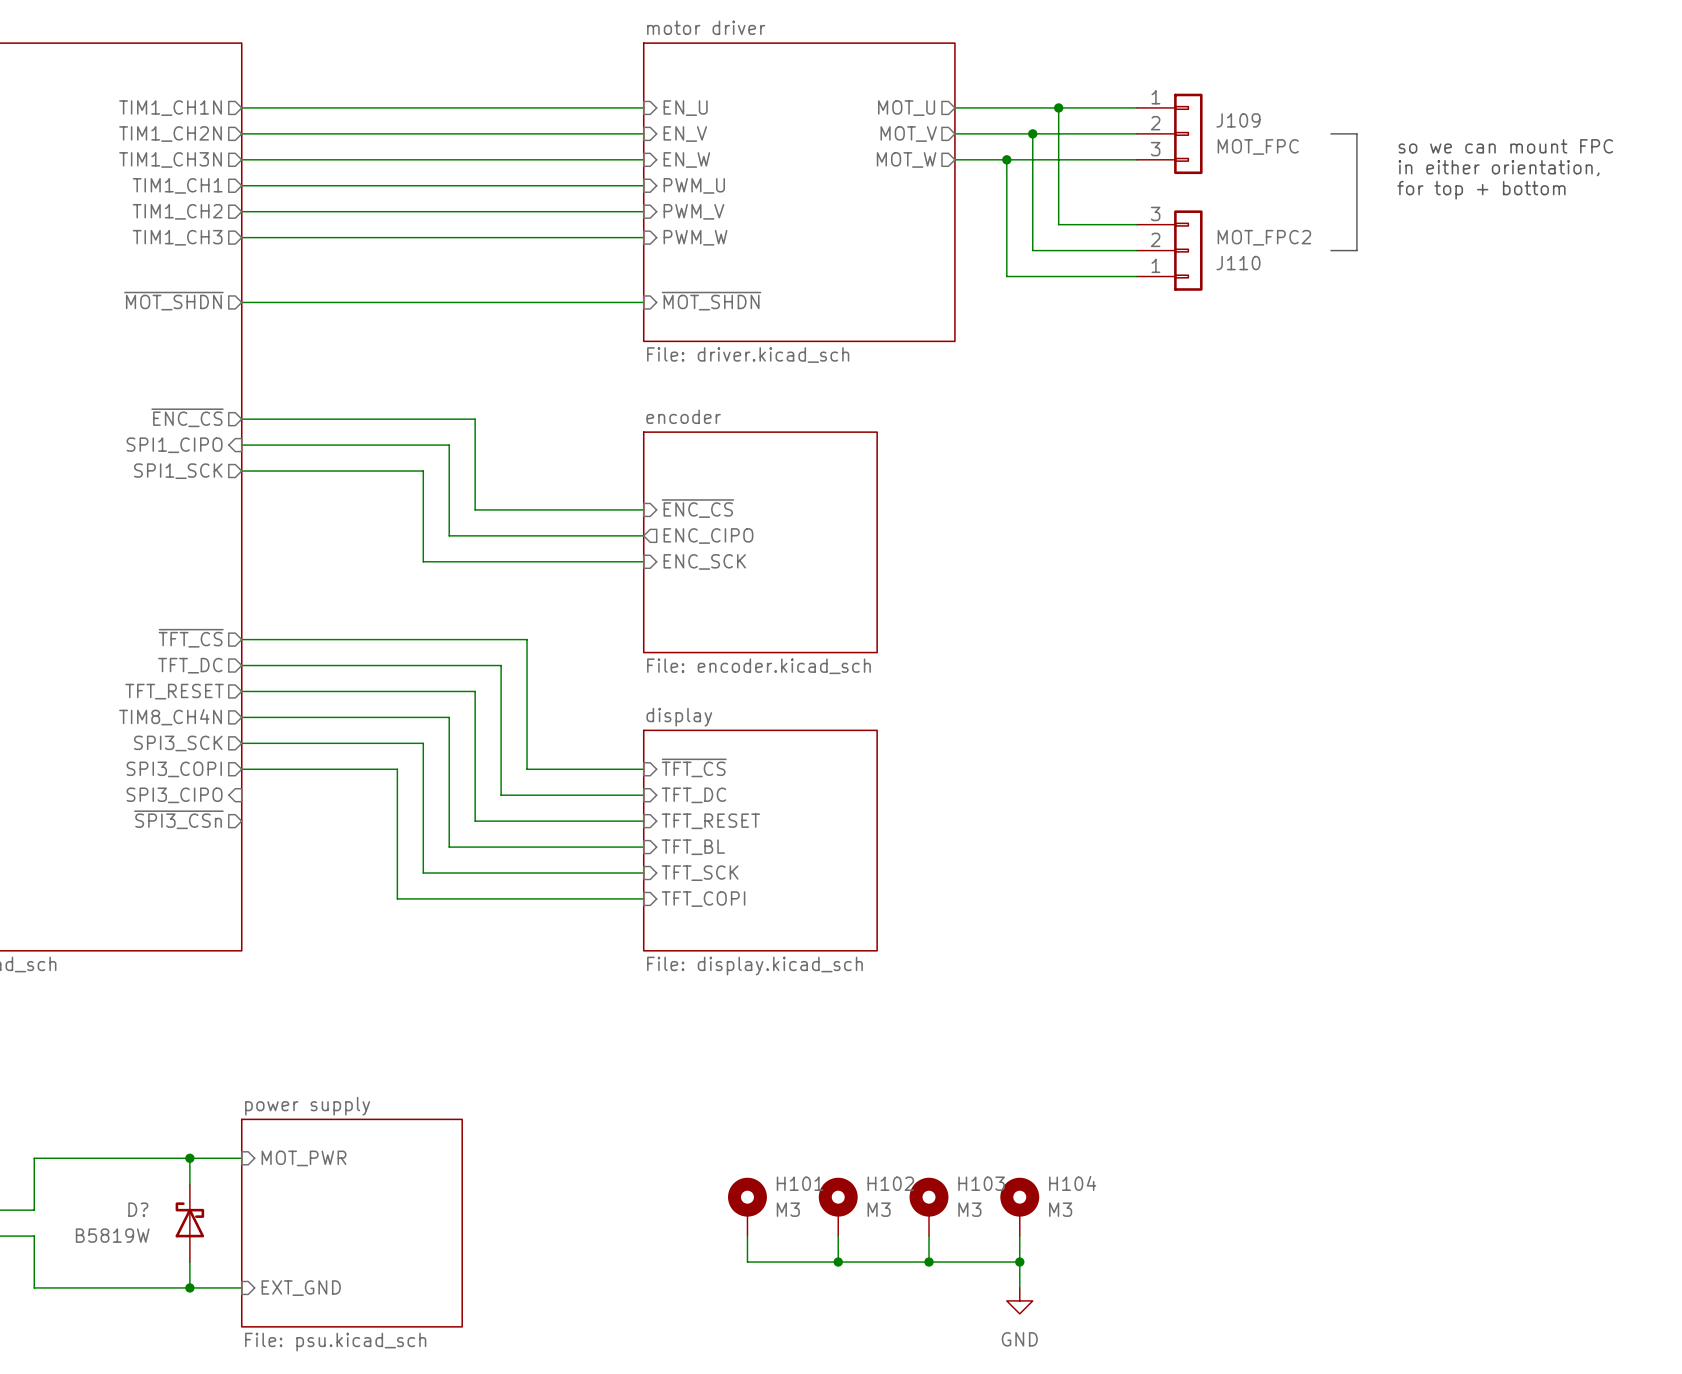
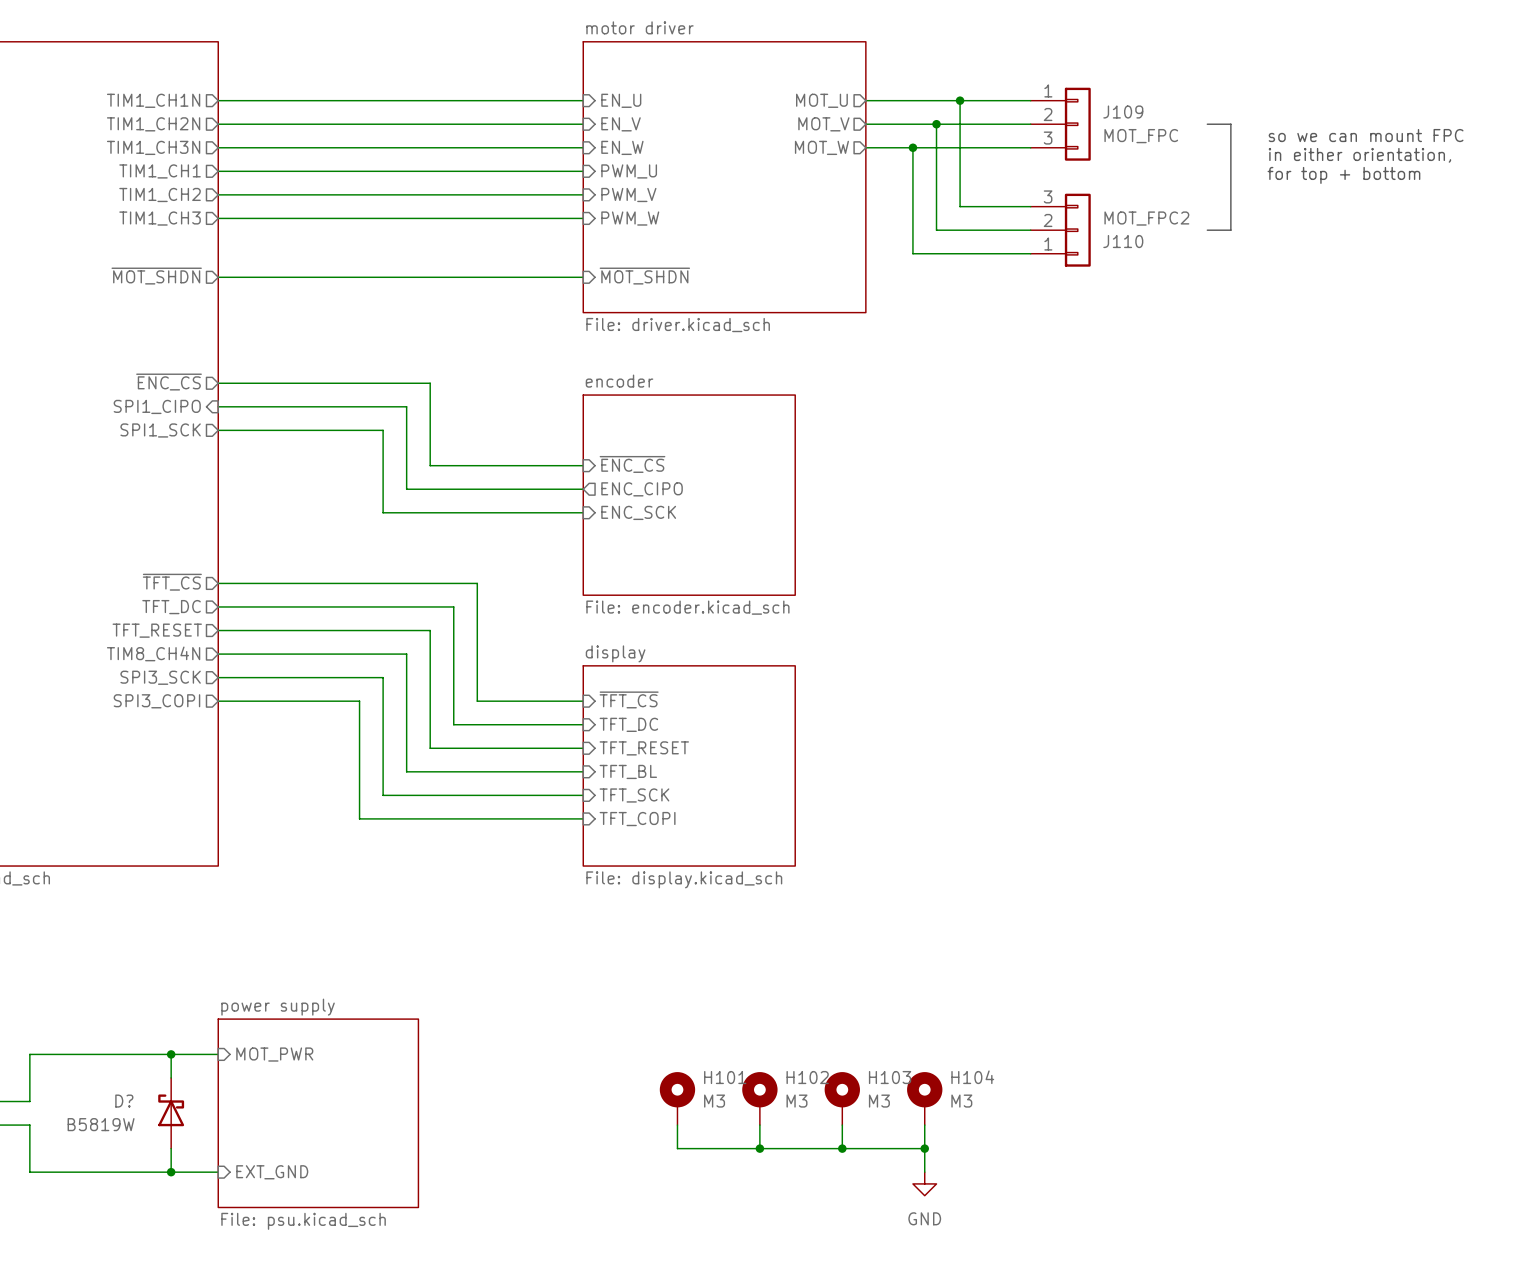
sheet pin: SPI3_CIPO (174, 795) -> none
sheet pin: ~{SPI3_CSn} (178, 819) -> none

